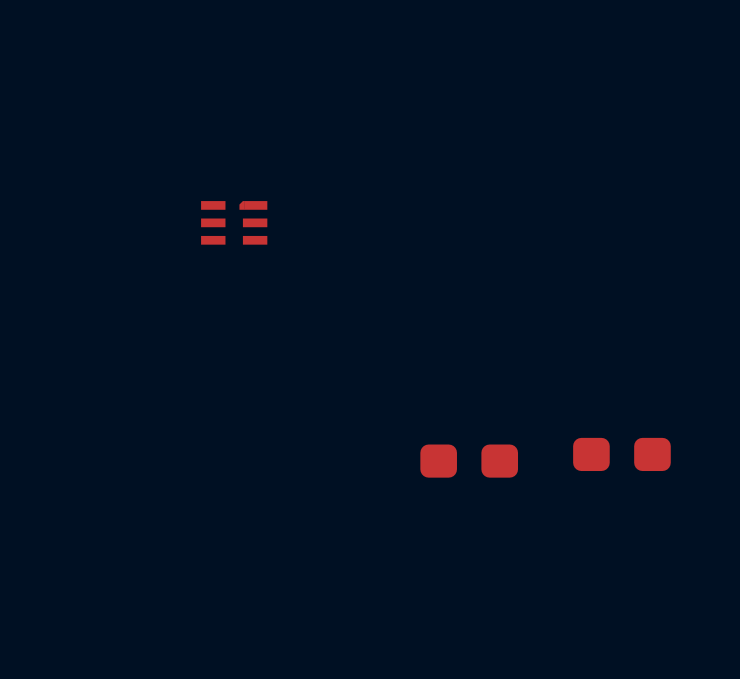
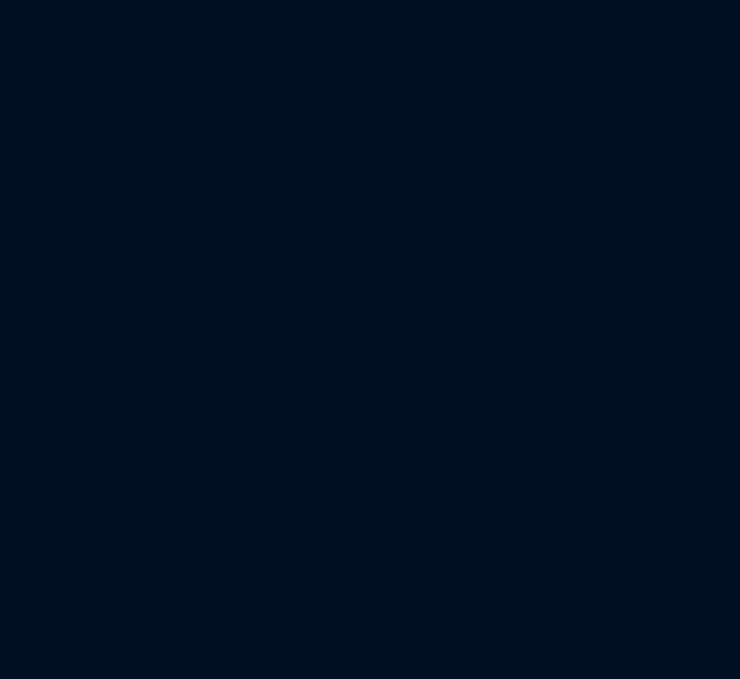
part: (234, 222) -> none
part: (621, 454) -> none
part: (469, 461) -> none

